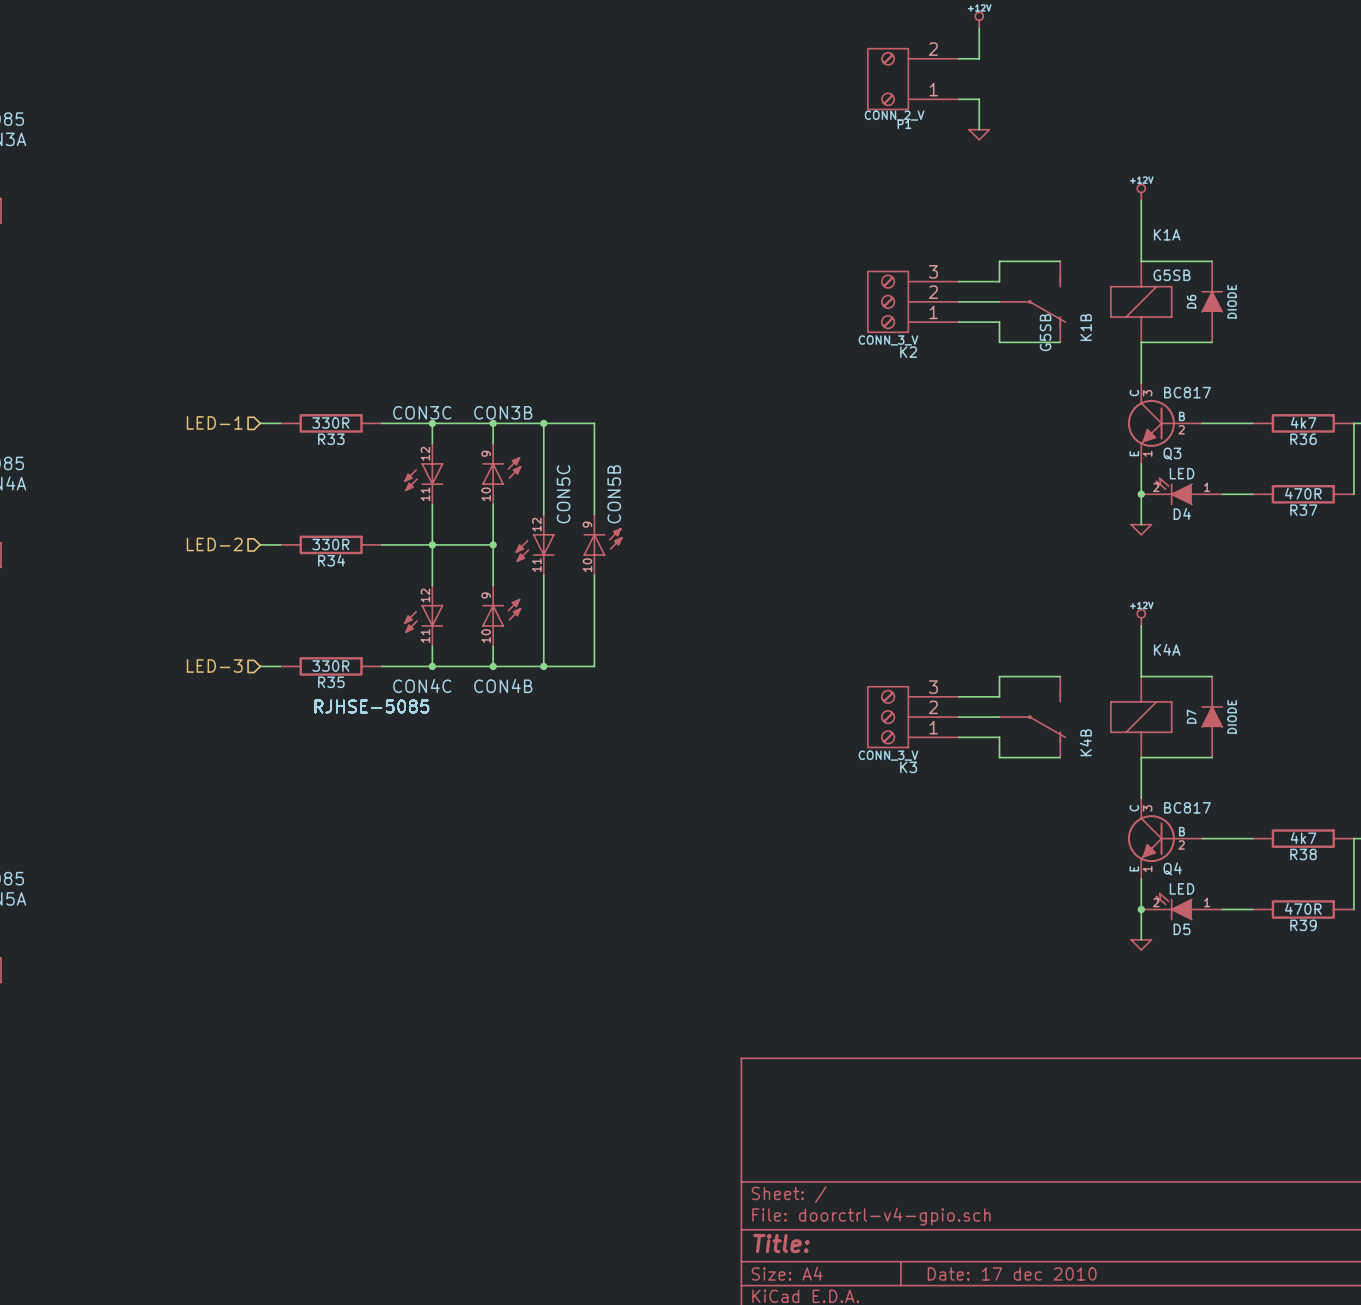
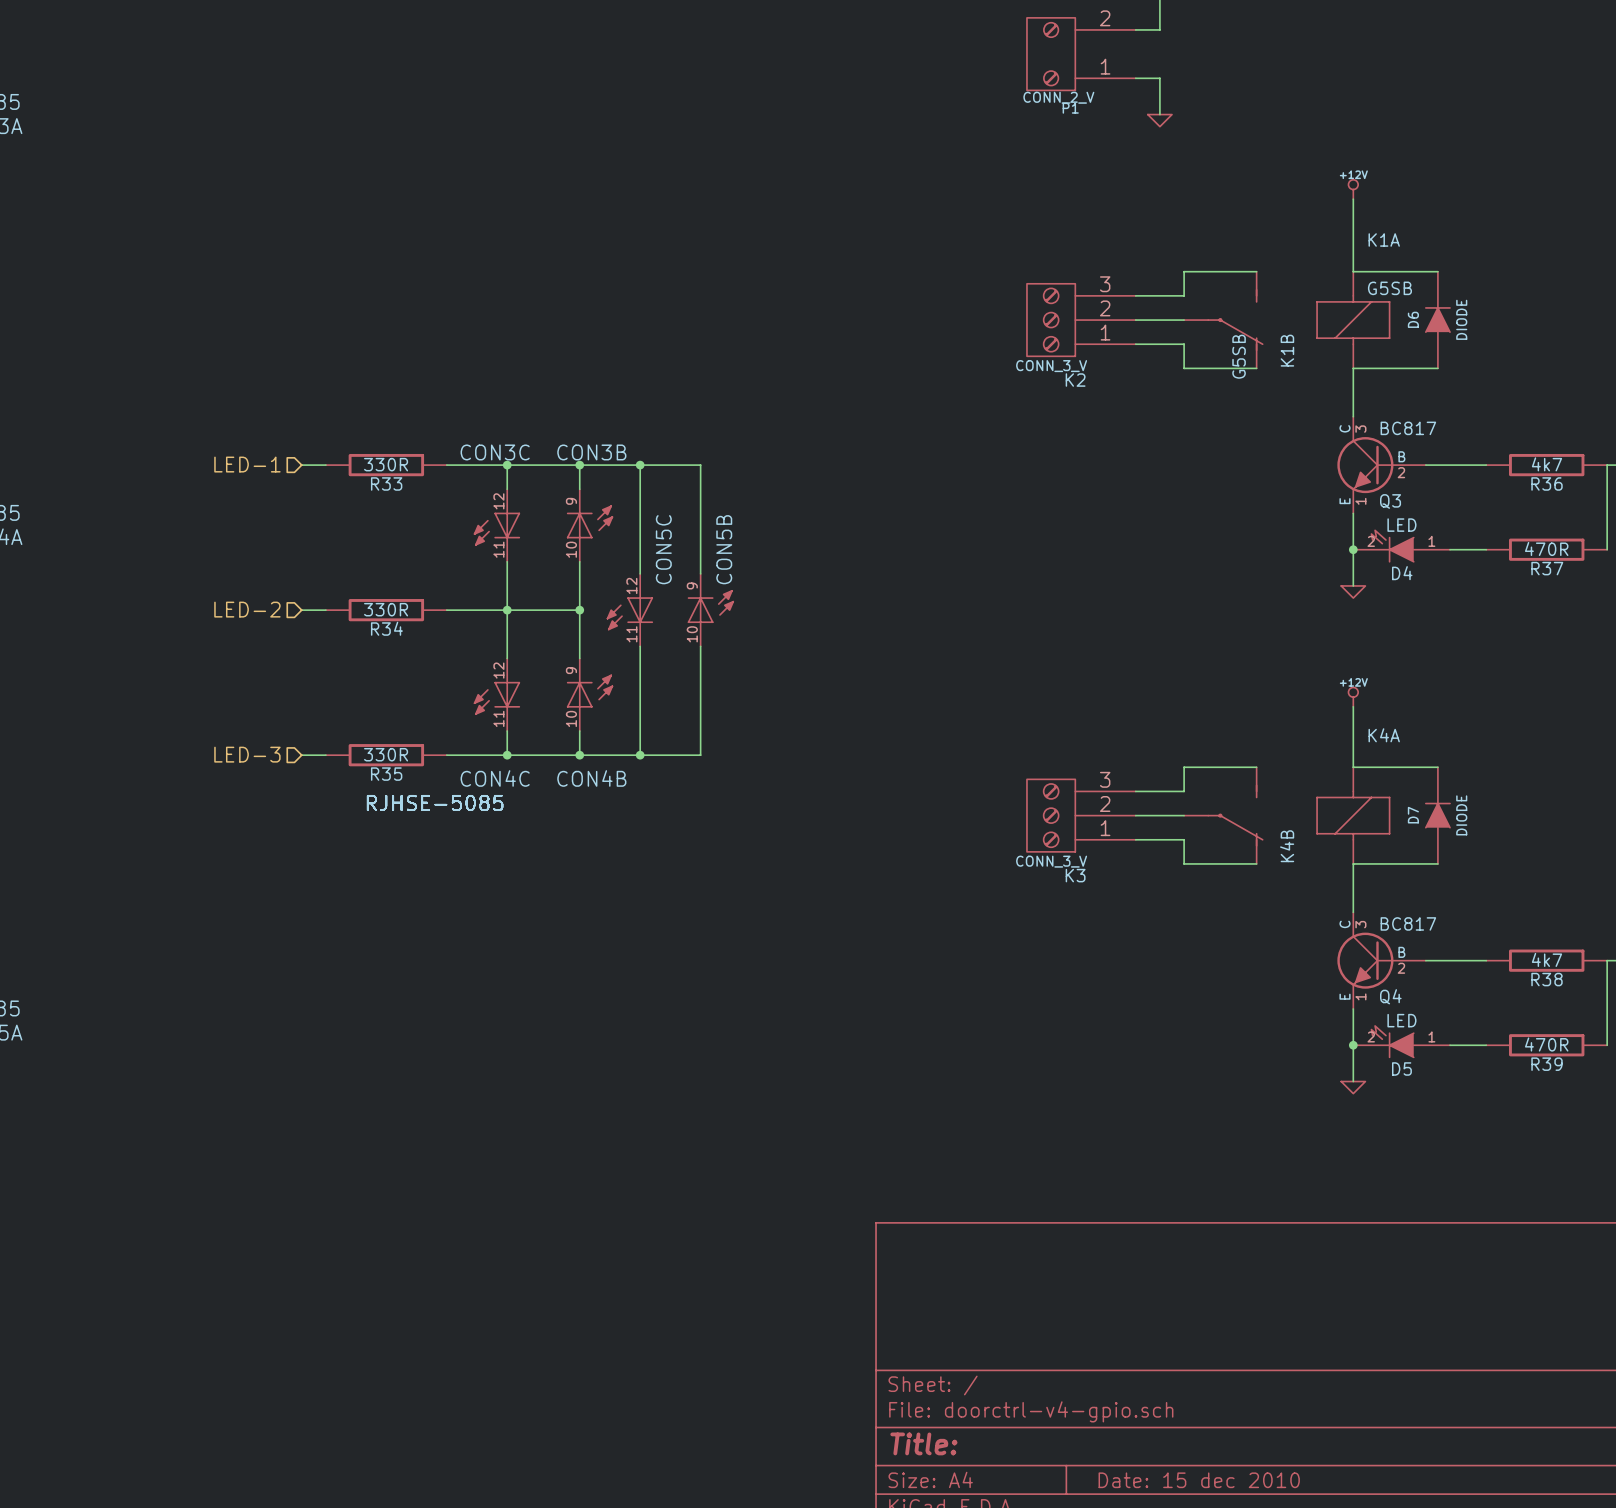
title block: Date: 17 dec 2010 (1012, 1273) -> Date: 15 dec 2010 (1199, 1480)

